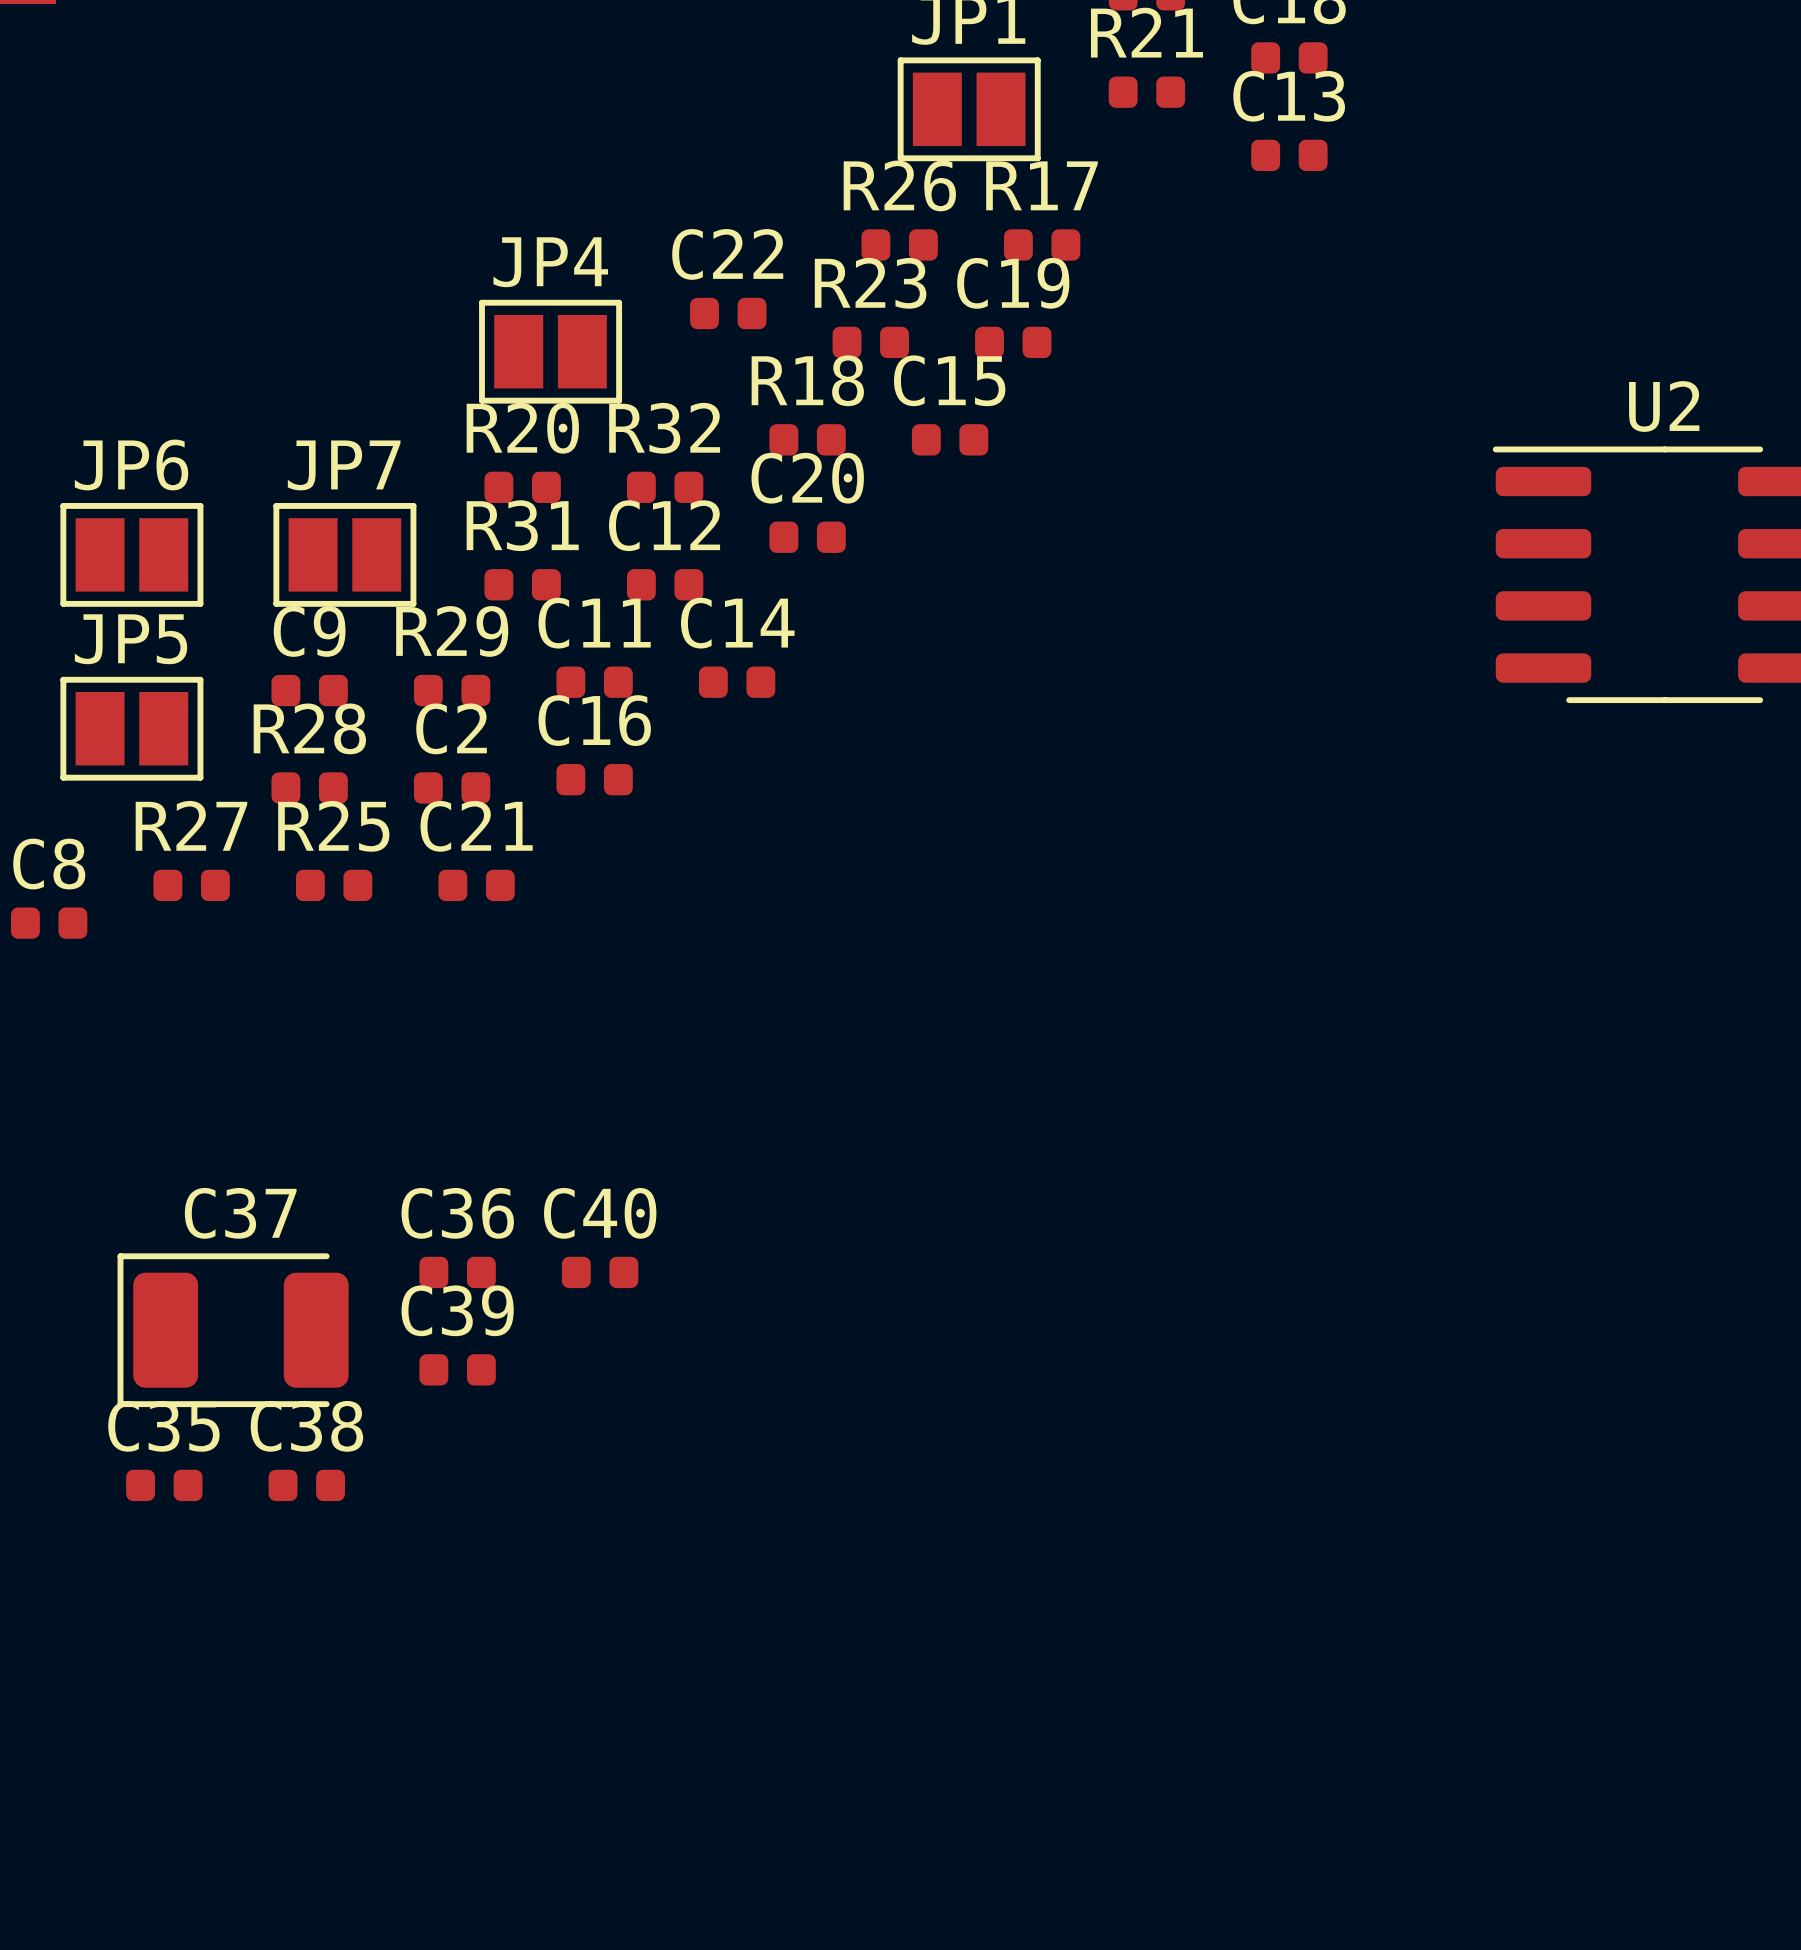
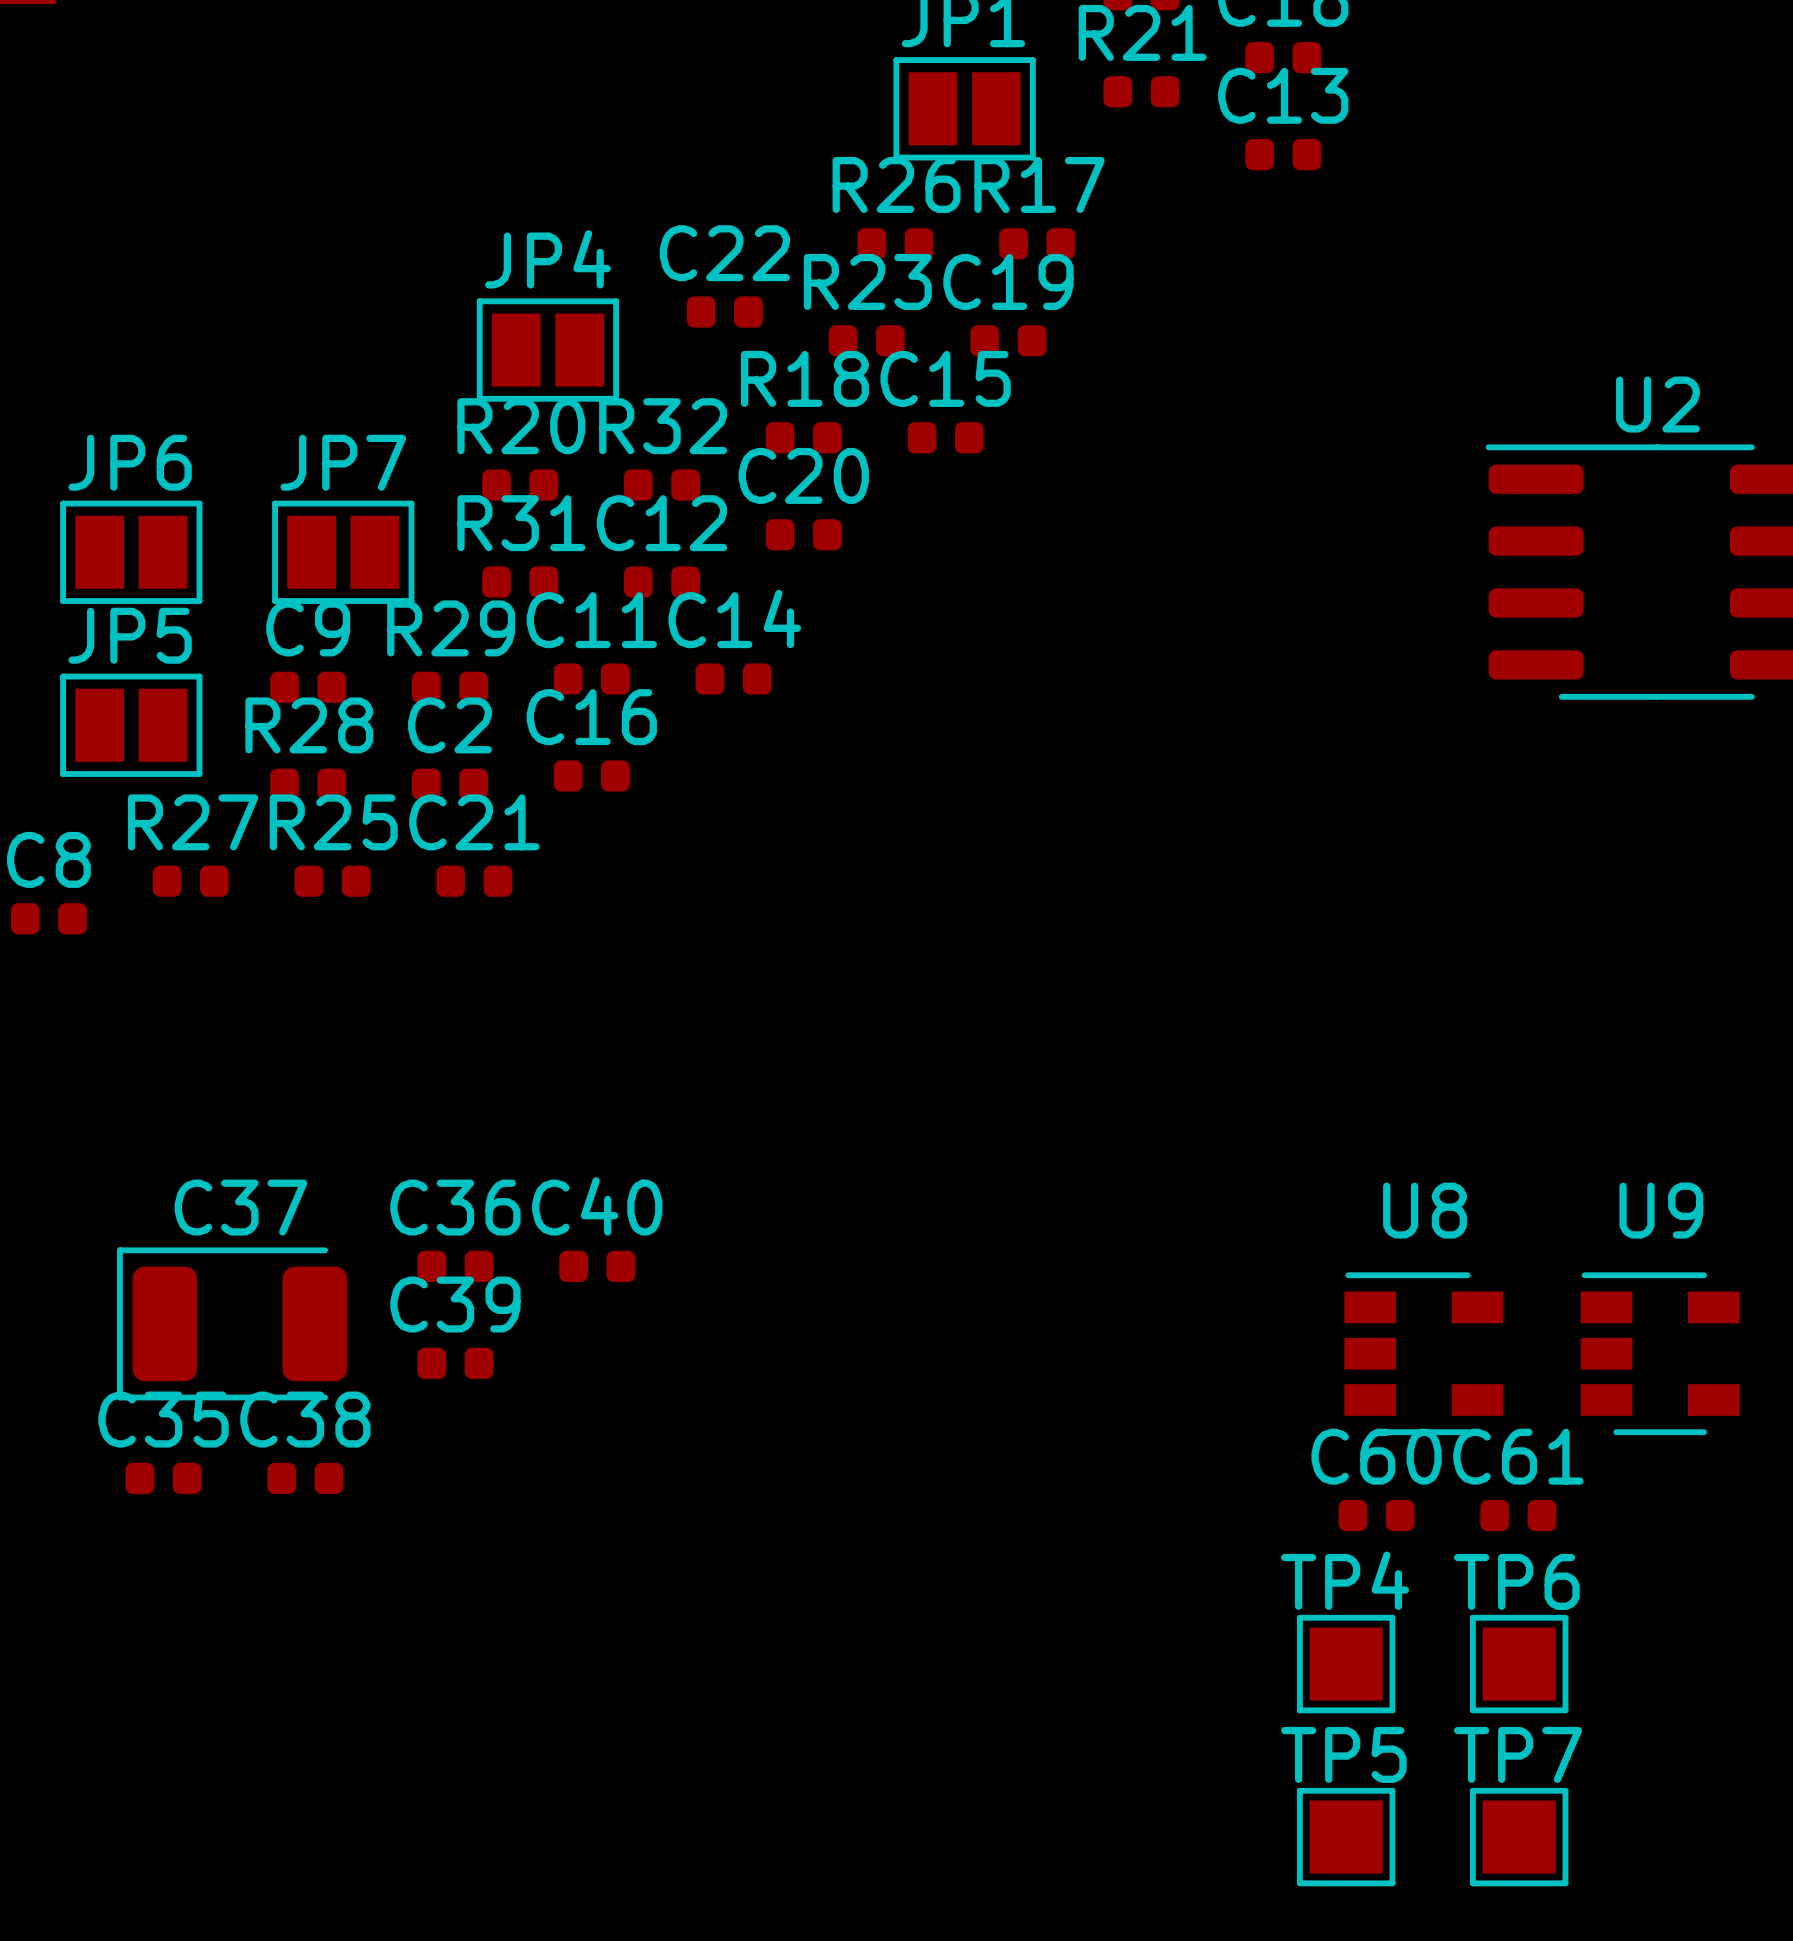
U8: none -> (1423, 1353)
U9: none -> (1660, 1353)
C60: none -> (1376, 1515)
C61: none -> (1518, 1515)
TP4: none -> (1346, 1664)
TP6: none -> (1519, 1664)
TP5: none -> (1346, 1837)
TP7: none -> (1519, 1837)

